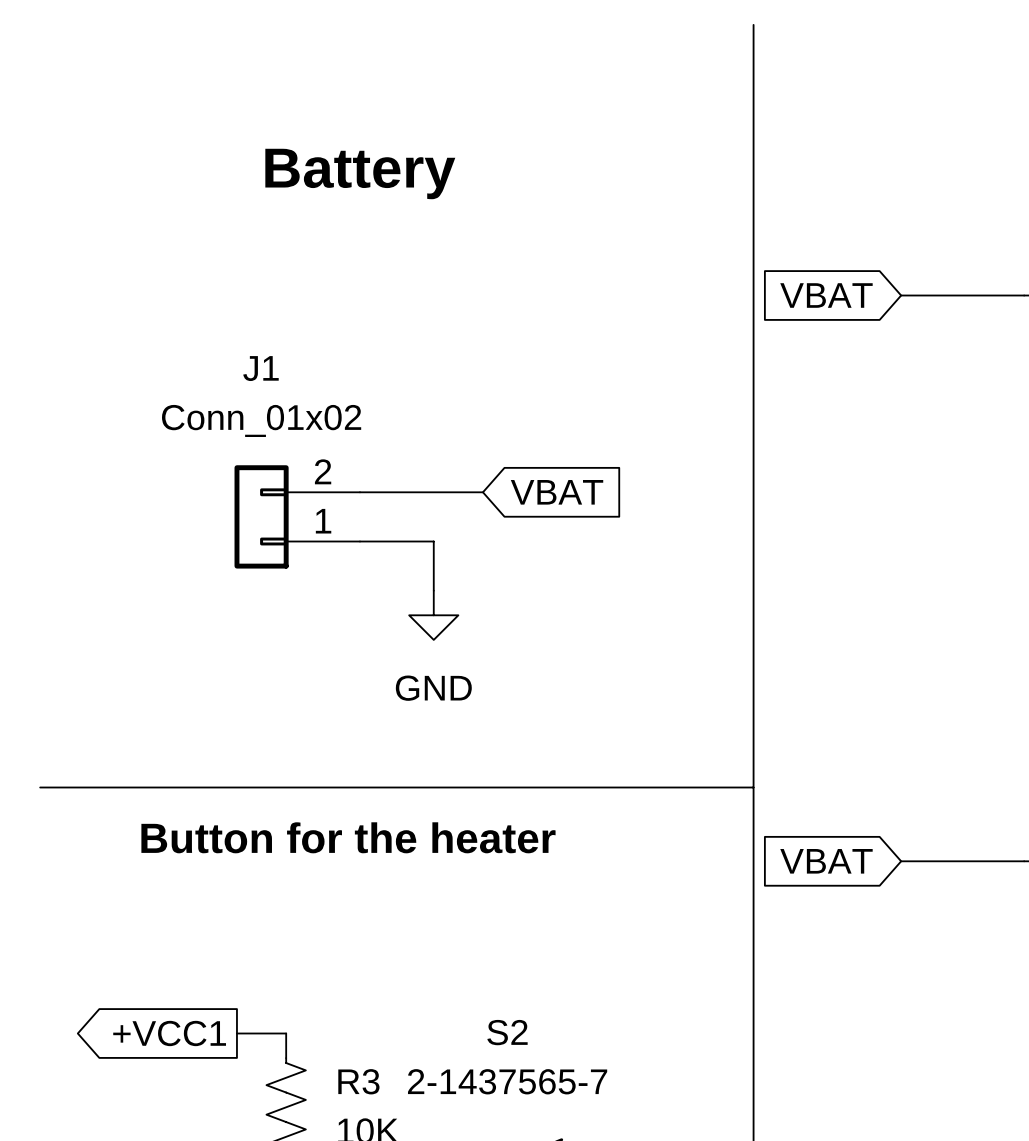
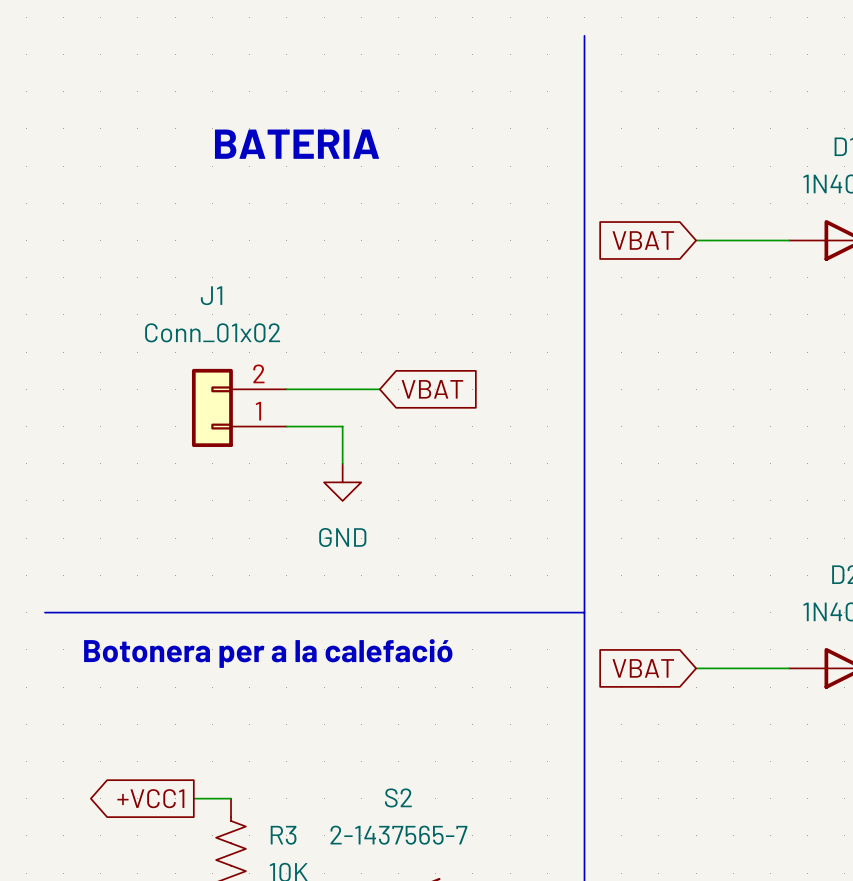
text: Battery (360, 173) -> BATERIA (297, 144)
text: Button for the heater (348, 837) -> none
text: none -> Botonera per a la calefació (268, 653)

